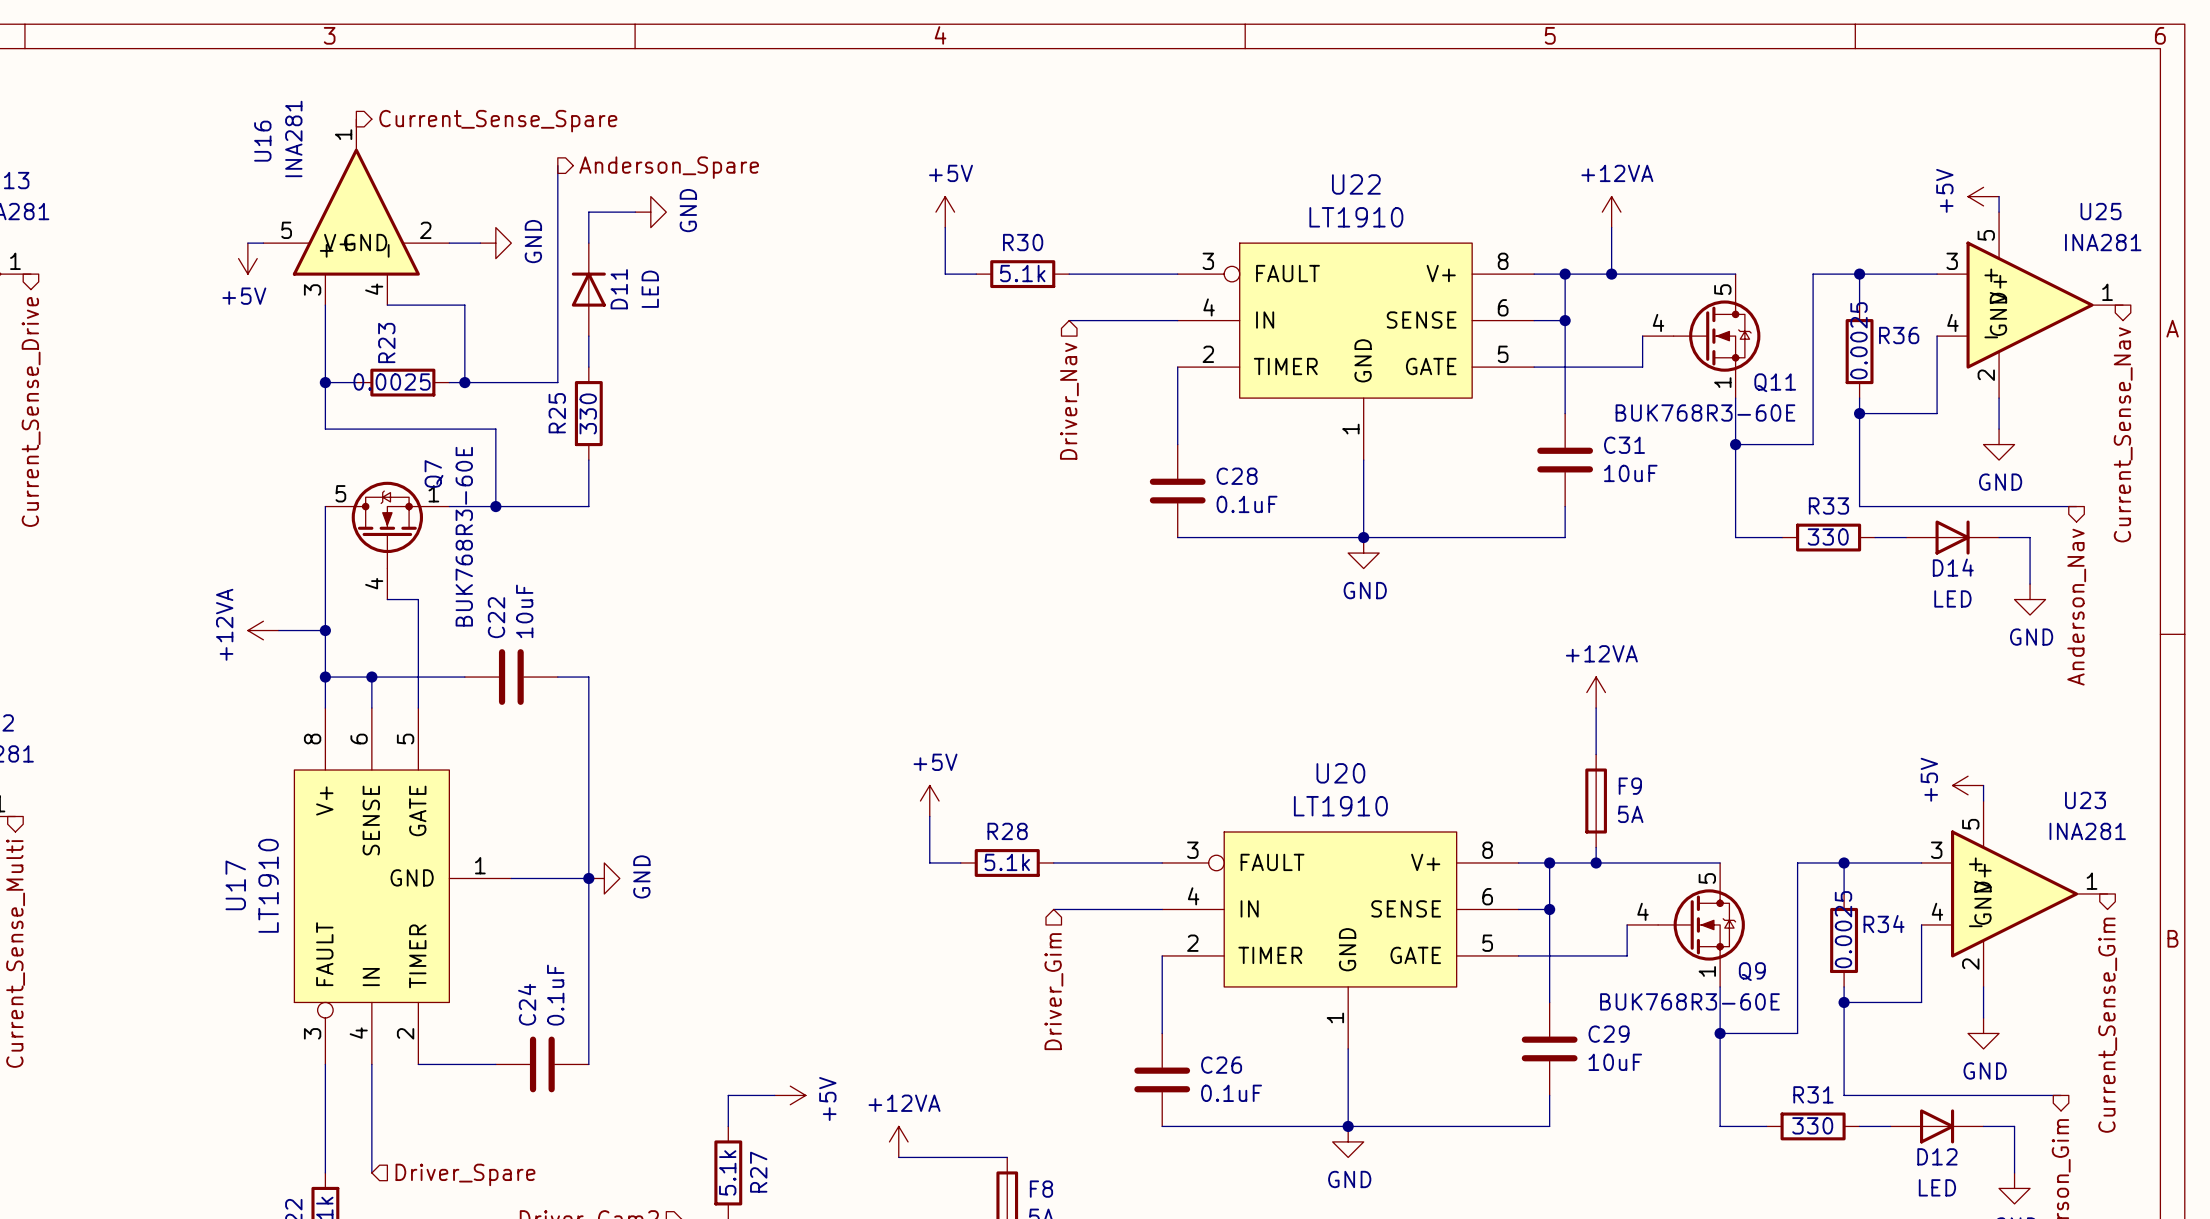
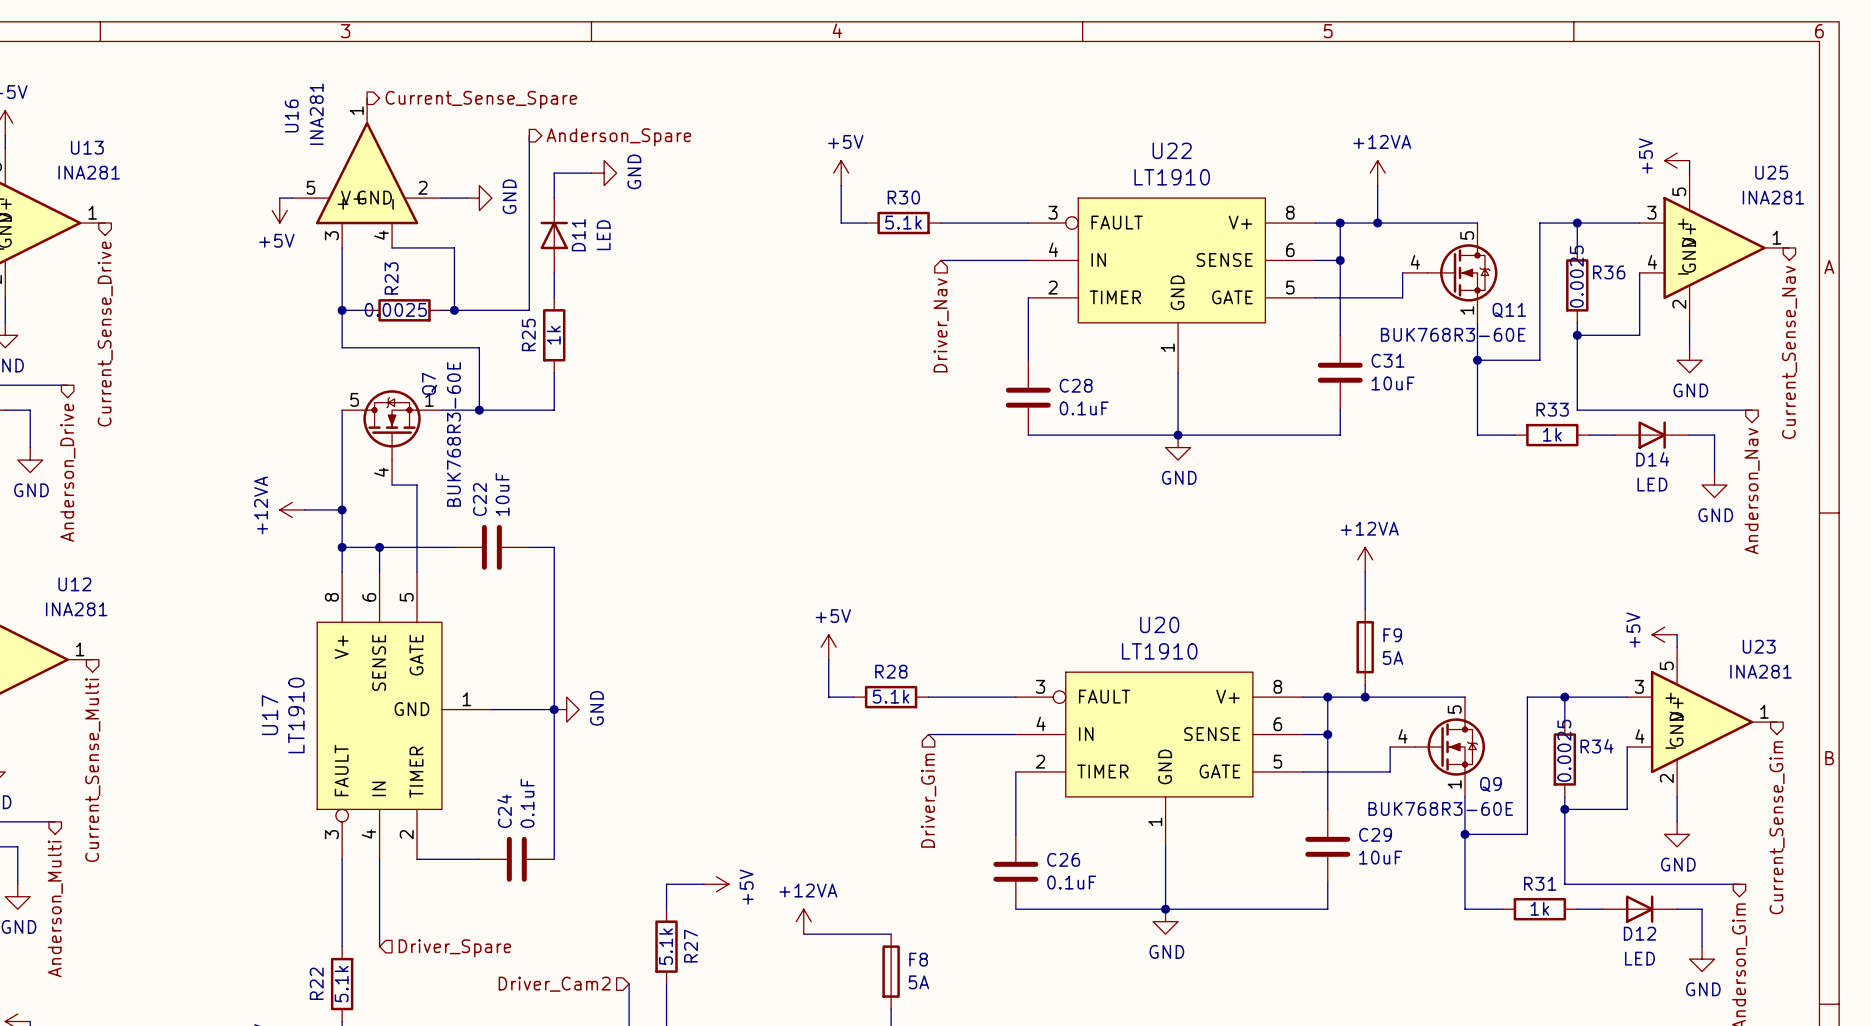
R25 value: 330 (588, 413) -> 1k (553, 335)
R33 value: 330 (1828, 536) -> 1k (1552, 434)
R31 value: 330 (1812, 1125) -> 1k (1539, 908)

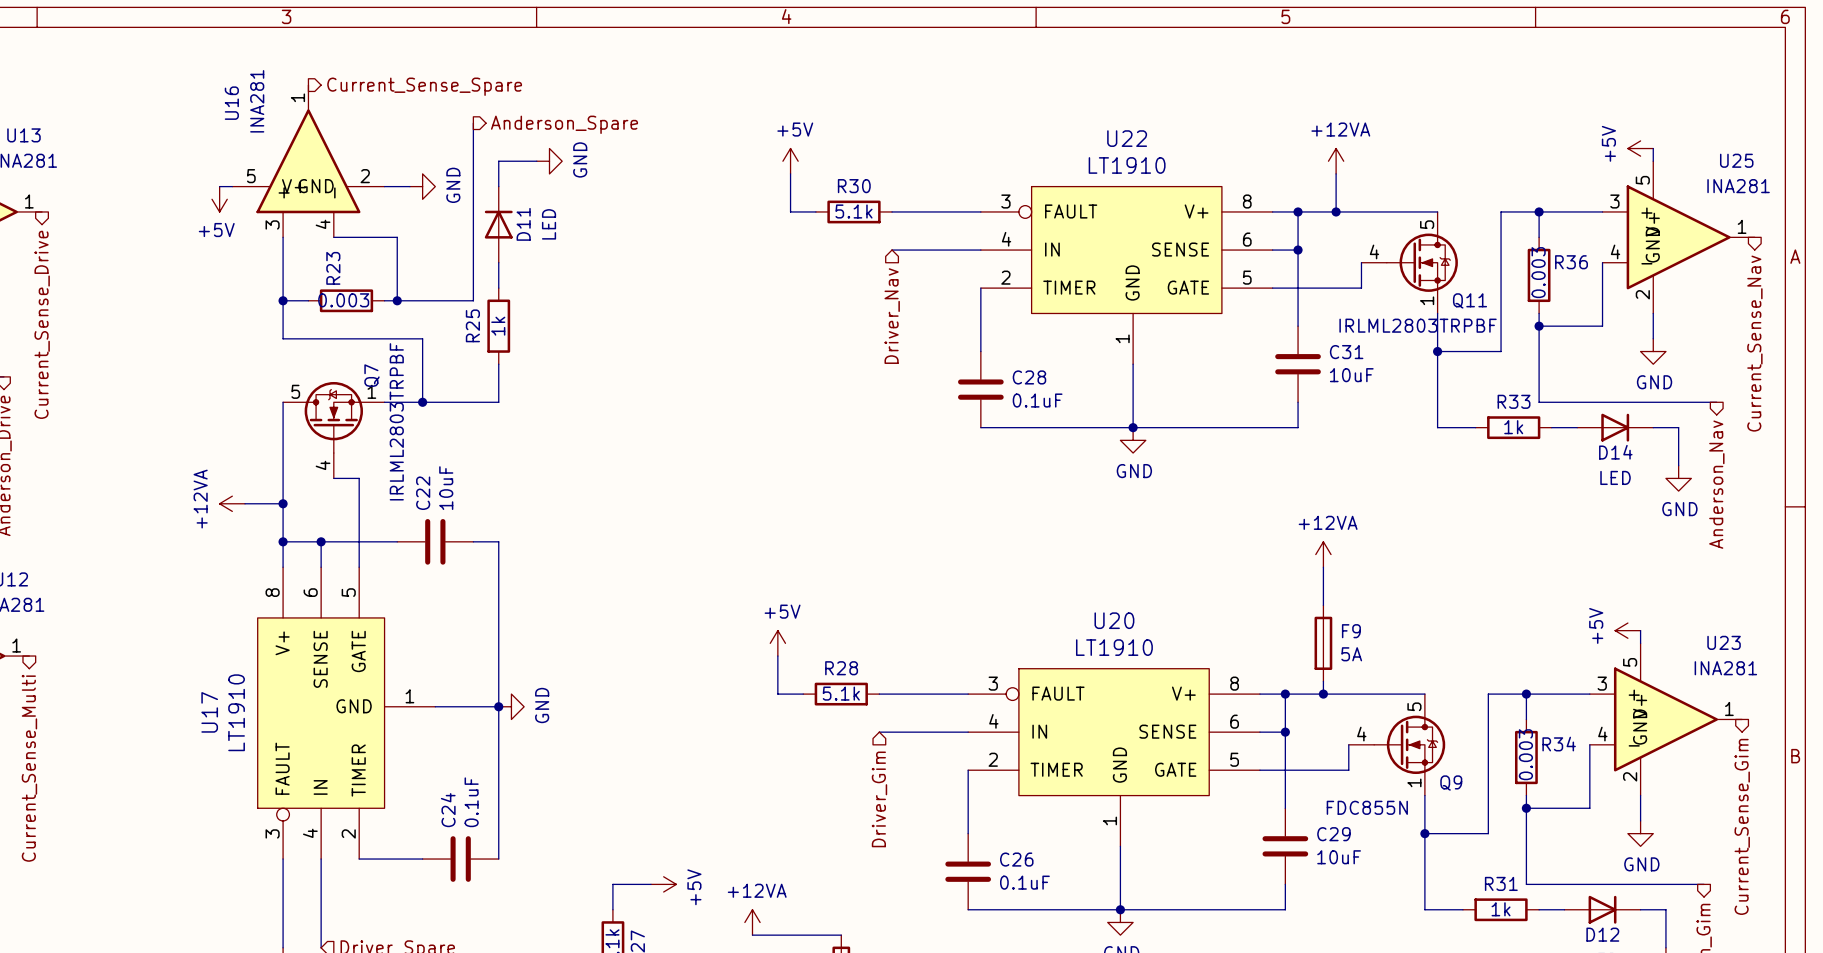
R36 value: 0.0025 (1576, 276) -> 0.003 (1538, 272)
R23 value: 0.0025 (395, 309) -> 0.003 (343, 300)
Q11 value: BUK768R3-60E (1453, 334) -> IRLML2803TRPBF (1418, 325)
Q7 value: BUK768R3-60E (453, 434) -> IRLML2803TRPBF (396, 421)
R34 value: 0.0025 (1564, 750) -> 0.003 (1525, 754)
Q9 value: BUK768R3-60E (1440, 808) -> FDC855N (1367, 807)

